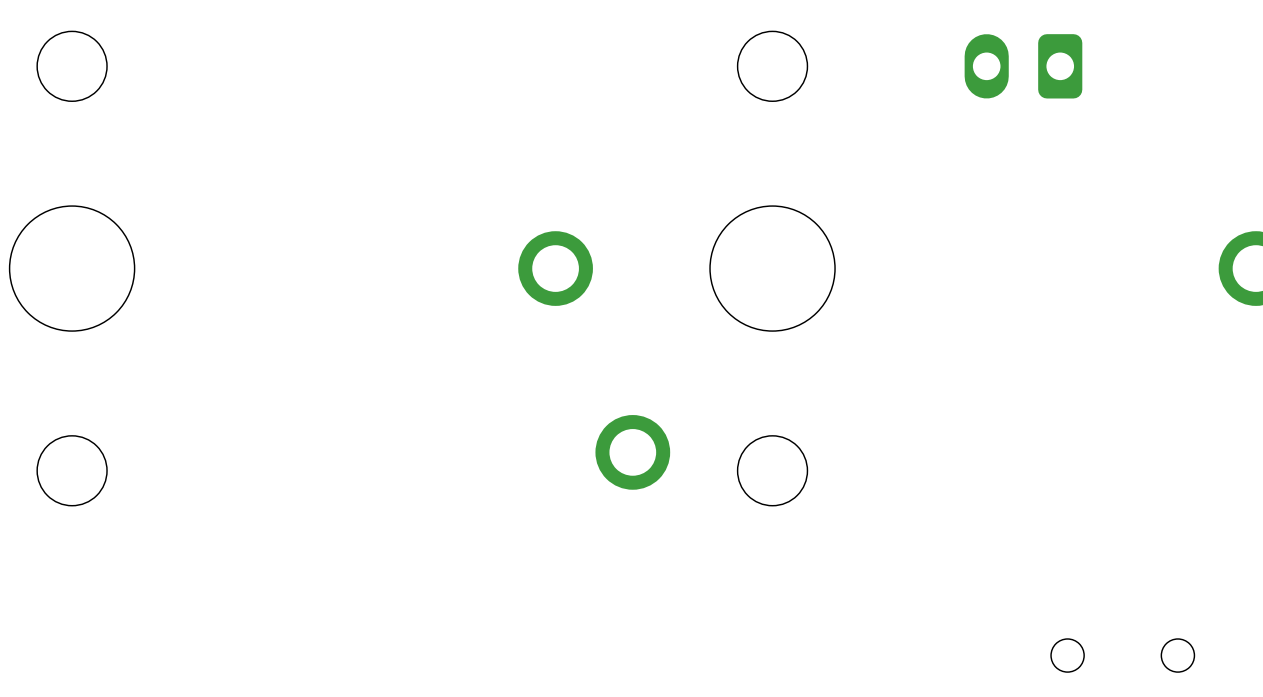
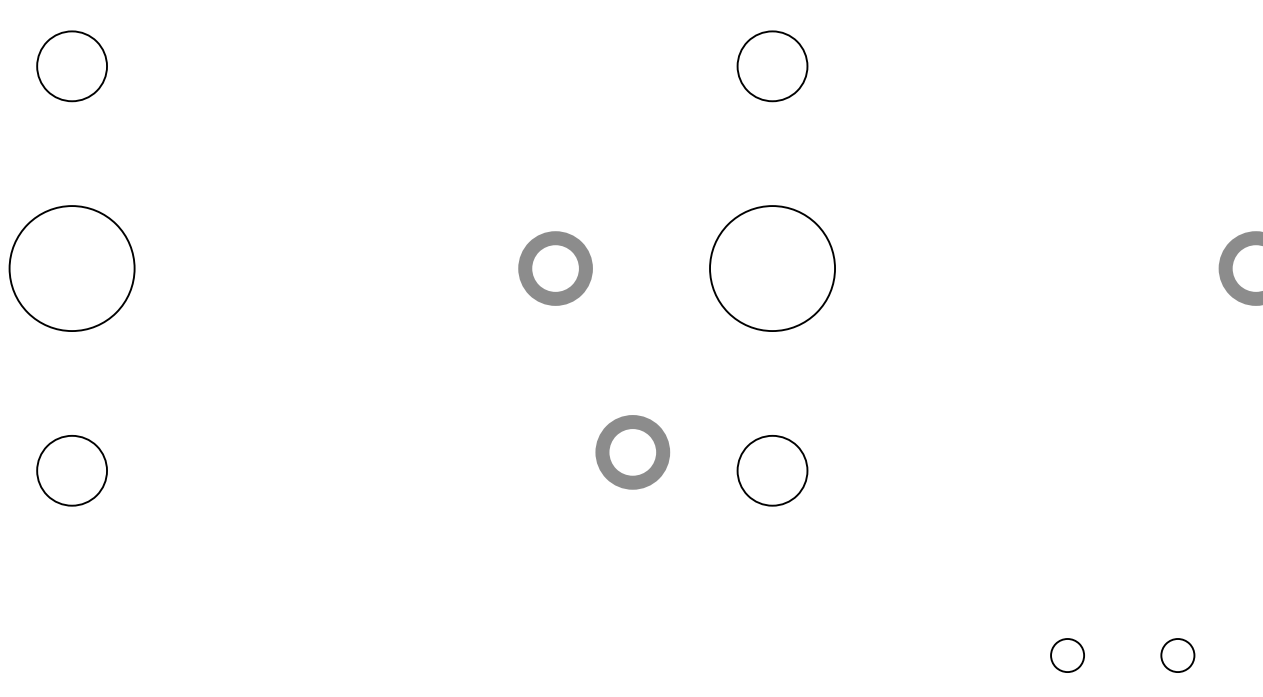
part: (1023, 66) -> none

